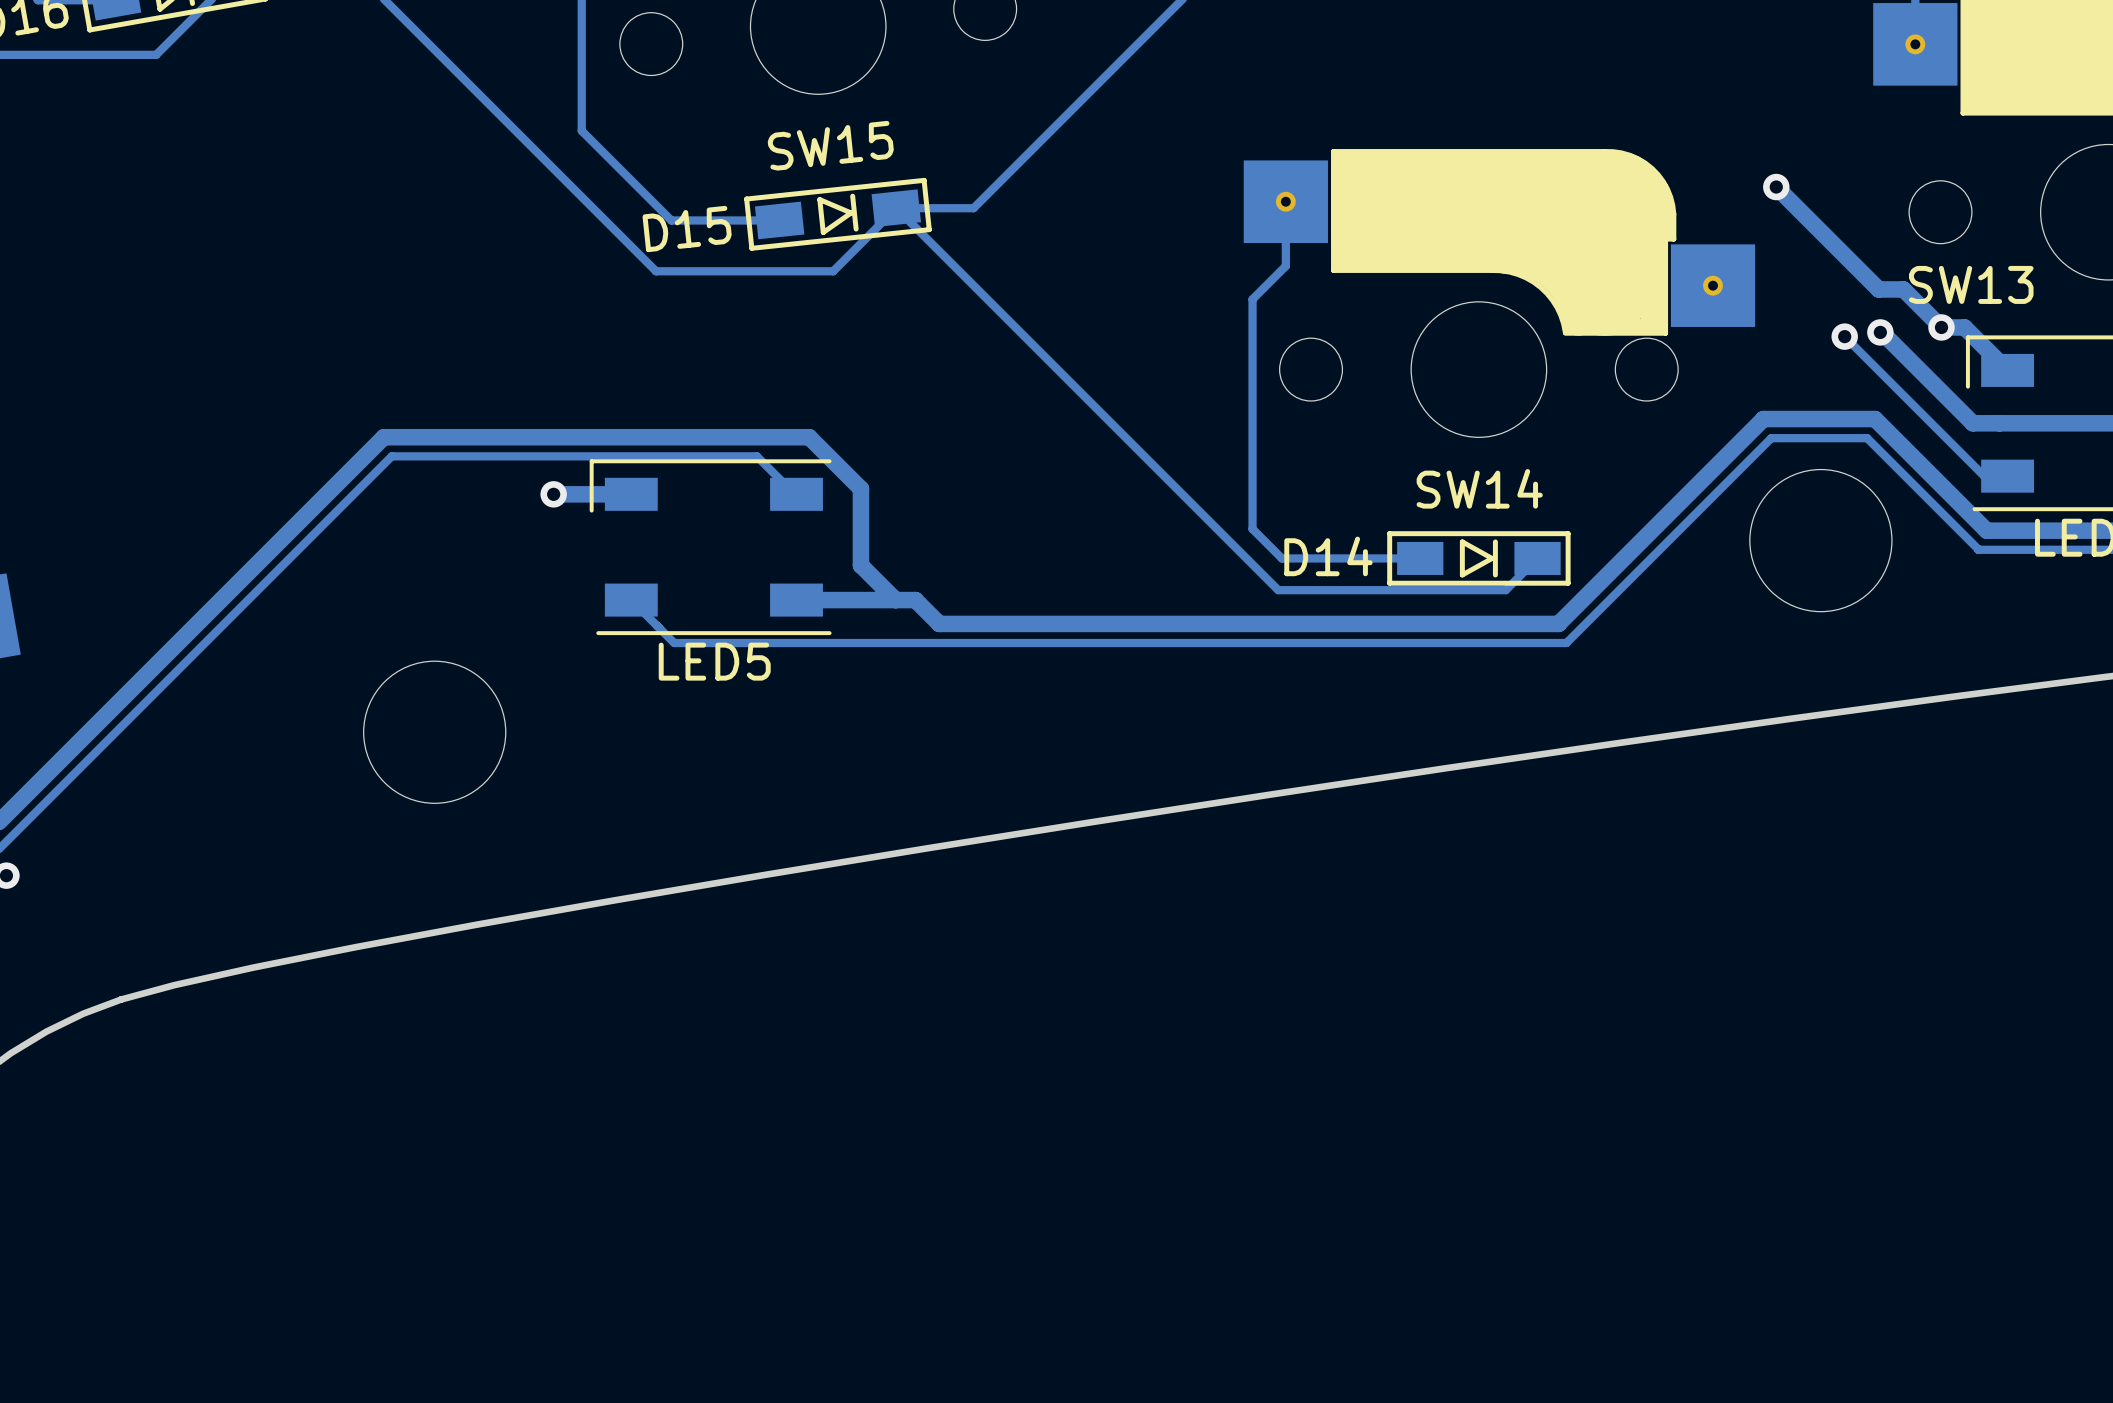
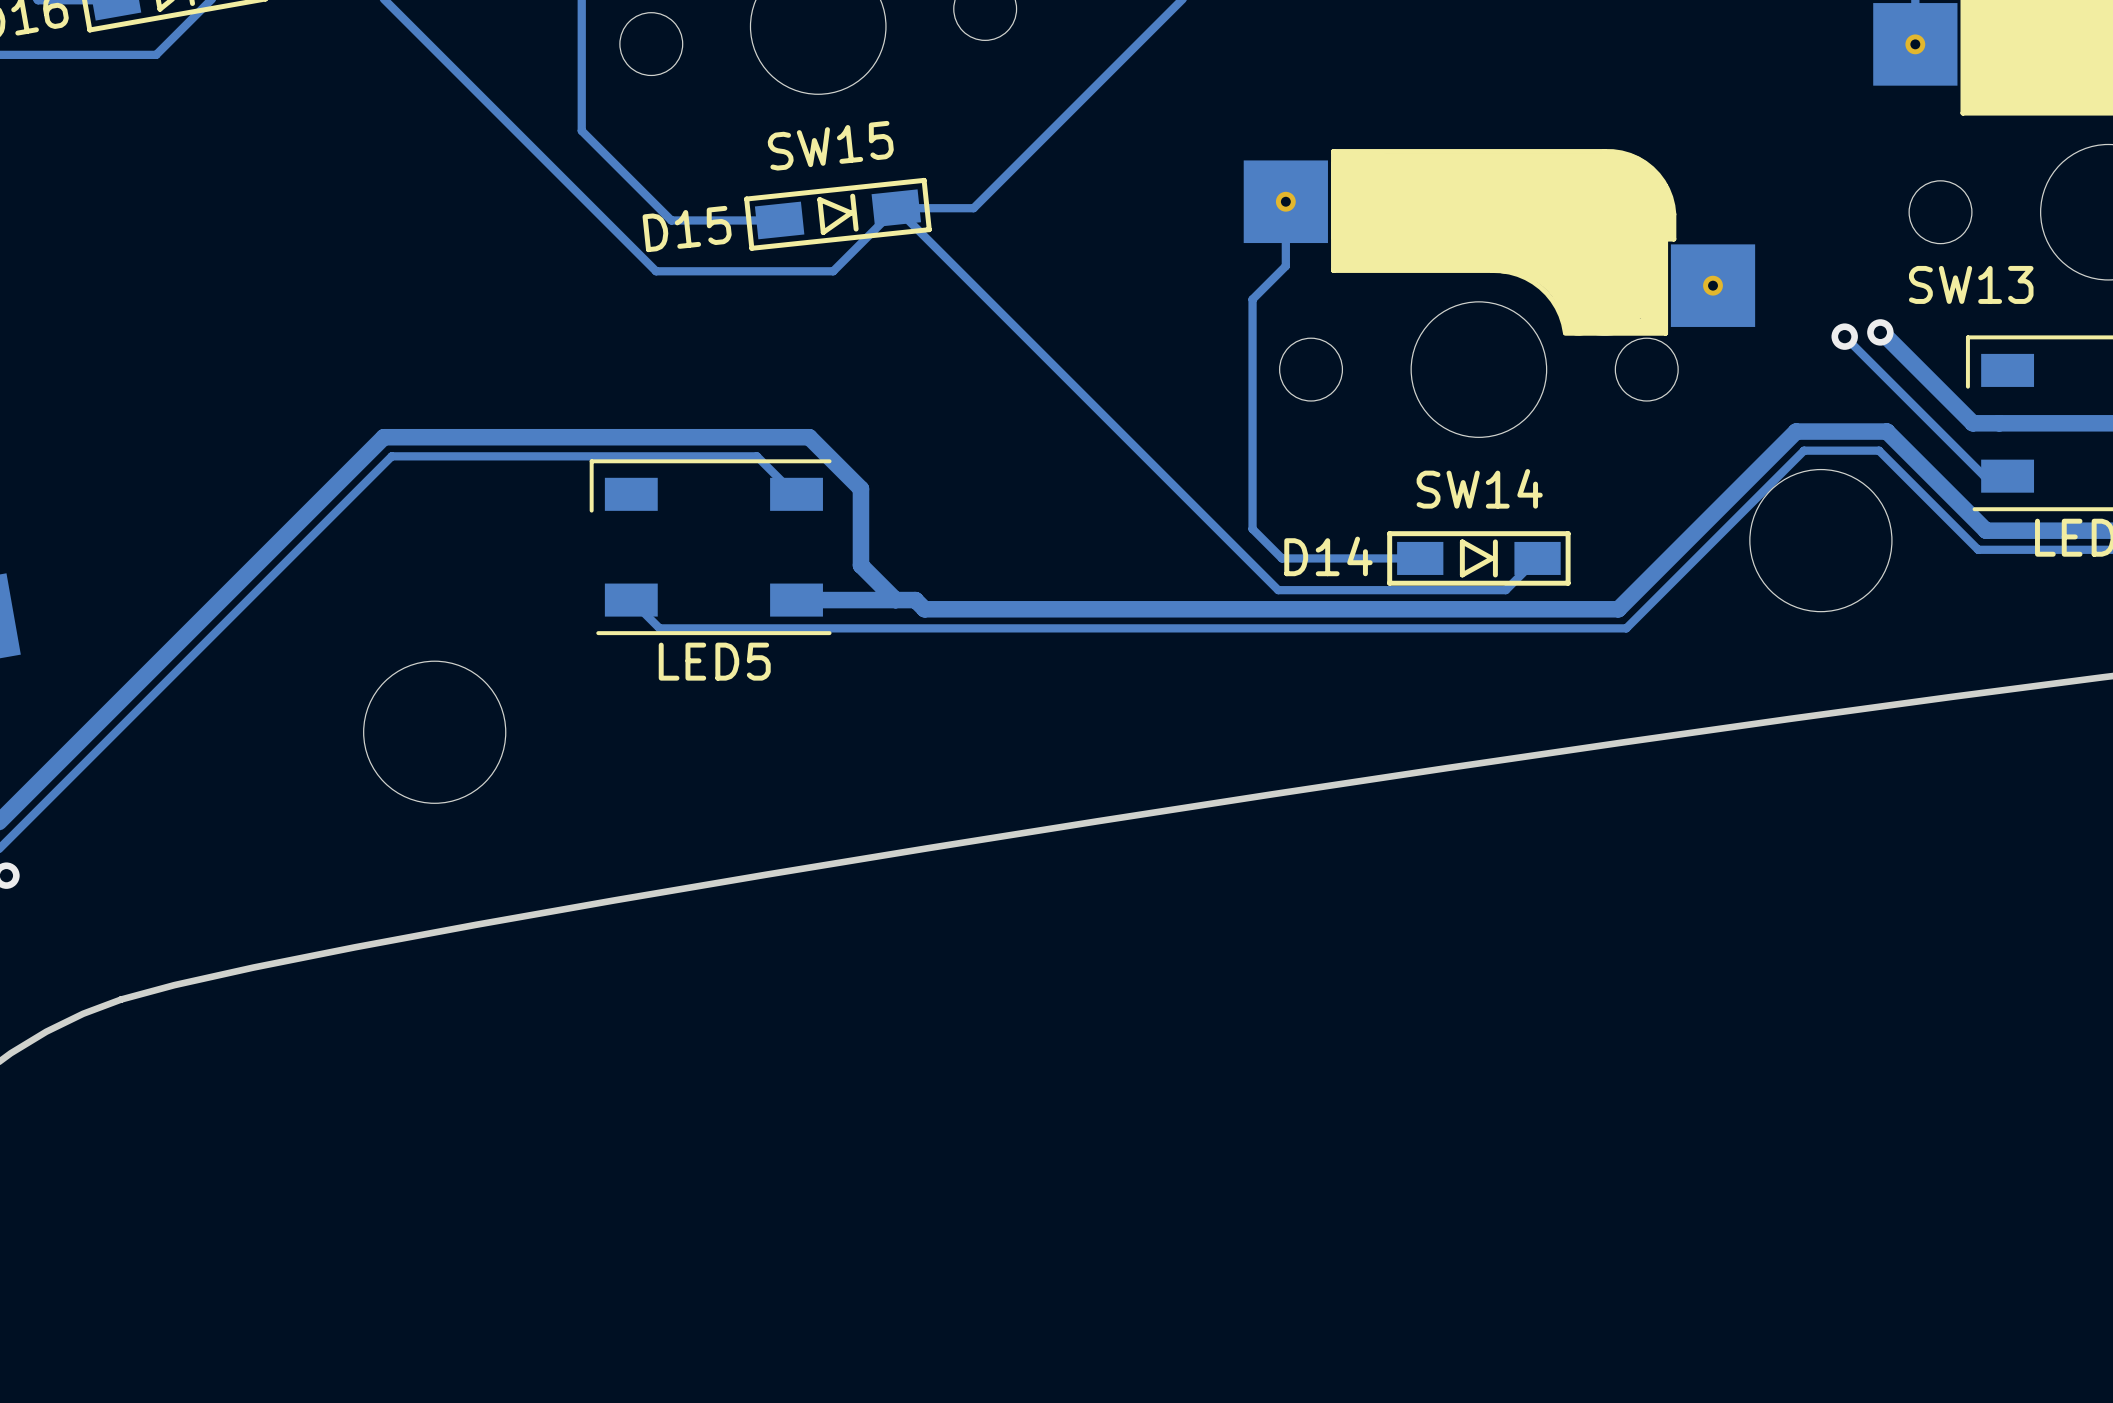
track: (1776, 187) (1878, 289) (1903, 289) (1941, 327) (1964, 327) (2007, 370) -> none
via: (1776, 187) -> none
via: (1941, 327) -> none
via: (553, 494) -> none
track: (631, 494) (553, 494) -> none
track: (1986, 530) (1875, 419) (1763, 419) (1558, 623) (939, 623) (924, 609) -> (1986, 530) (1886, 431) (1796, 431) (1618, 609) (924, 609)
track: (1978, 549) (1867, 438) (1771, 438) (1566, 643) (674, 643) (659, 628) -> (1978, 549) (1879, 450) (1804, 450) (1626, 628) (659, 628)

